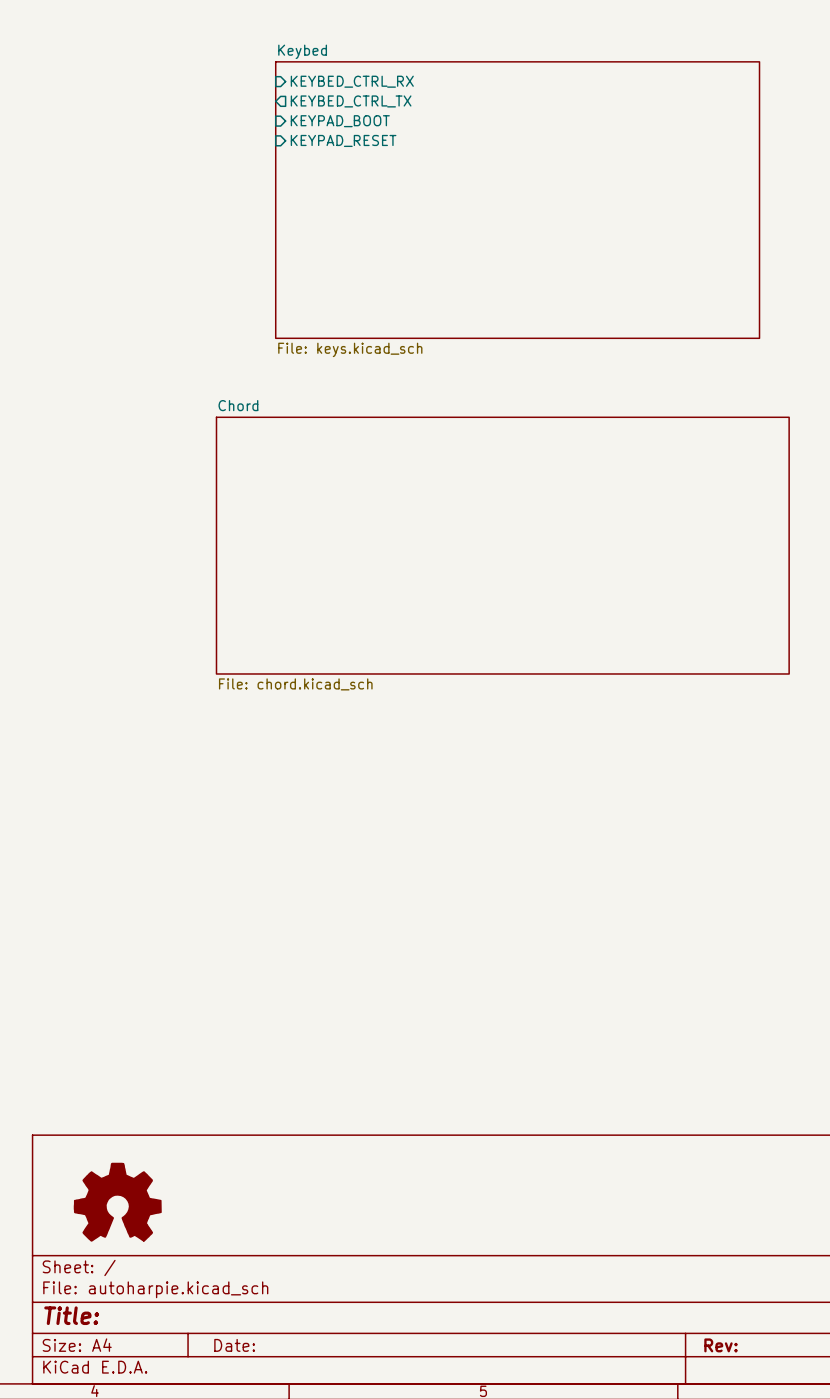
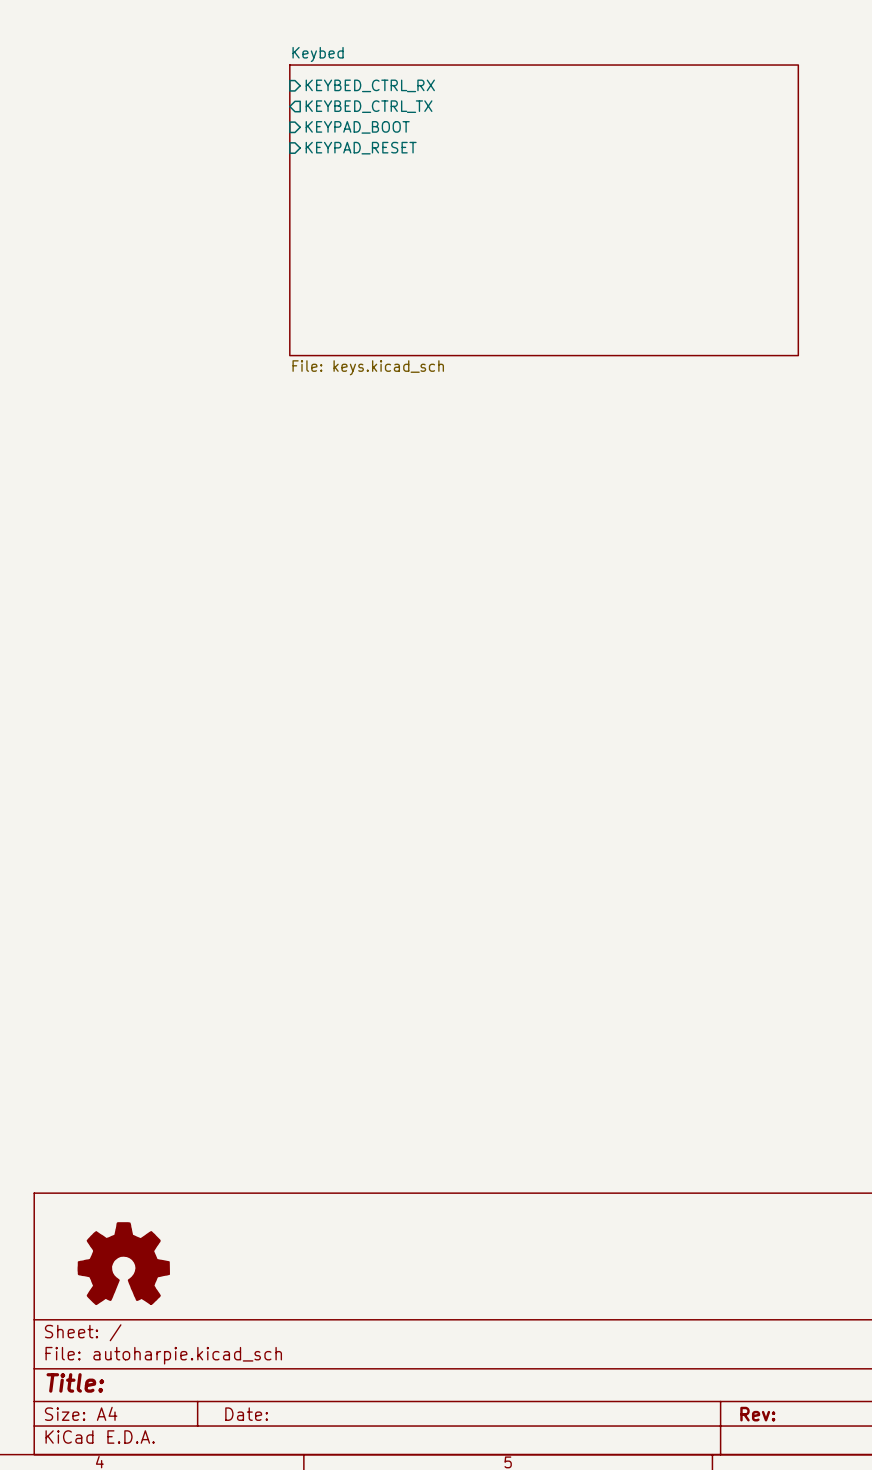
sheet Chord: File: chord.kicad_sch (502, 545) -> none

